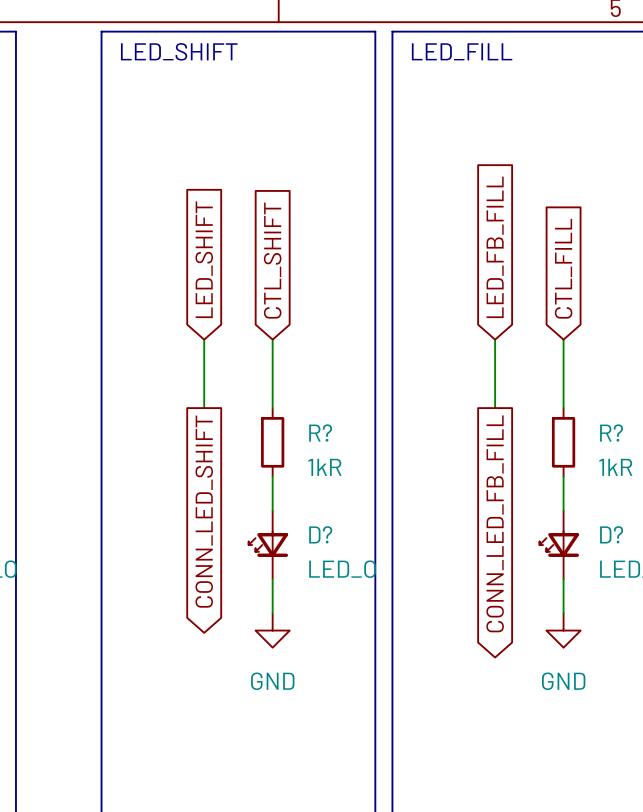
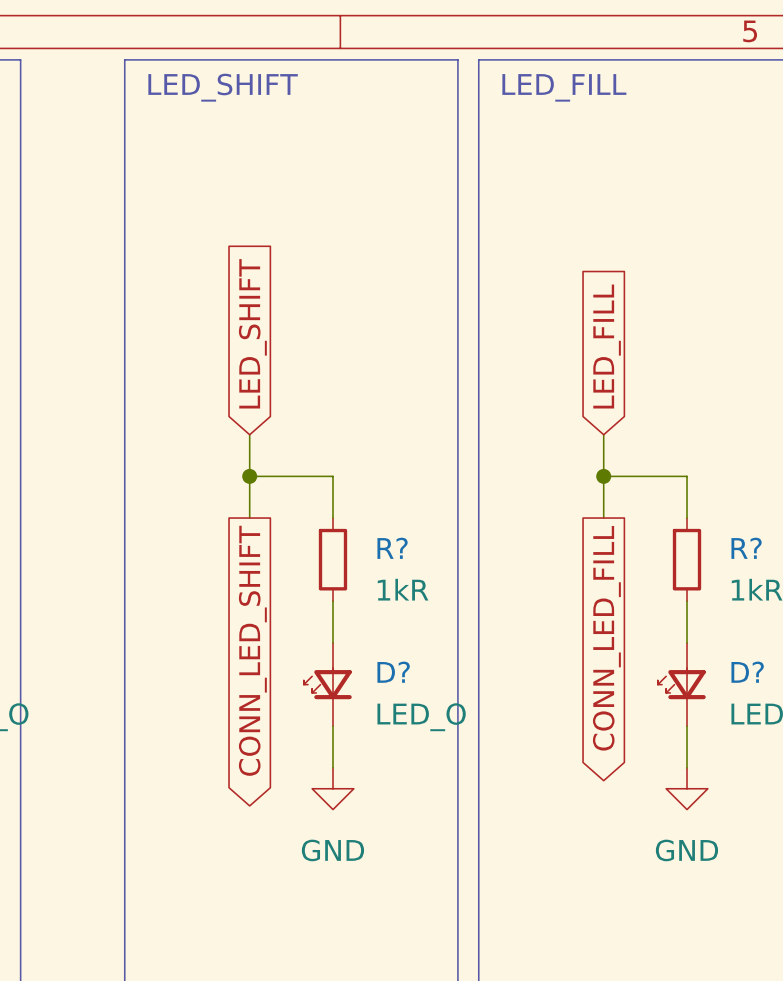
global label: LED_FB_FILL (495, 247) -> LED_FILL (607, 346)
global label: CTL_SHIFT (272, 260) -> none
global label: CTL_FILL (563, 268) -> none
wire: (272, 339) (272, 373) -> (249, 476) (332, 476)
wire: (563, 339) (563, 373) -> (603, 476) (687, 476)
junction: none -> (249, 476)
junction: none -> (603, 476)
global label: CONN_LED_FB_FILL (495, 523) -> CONN_LED_FILL (606, 638)

